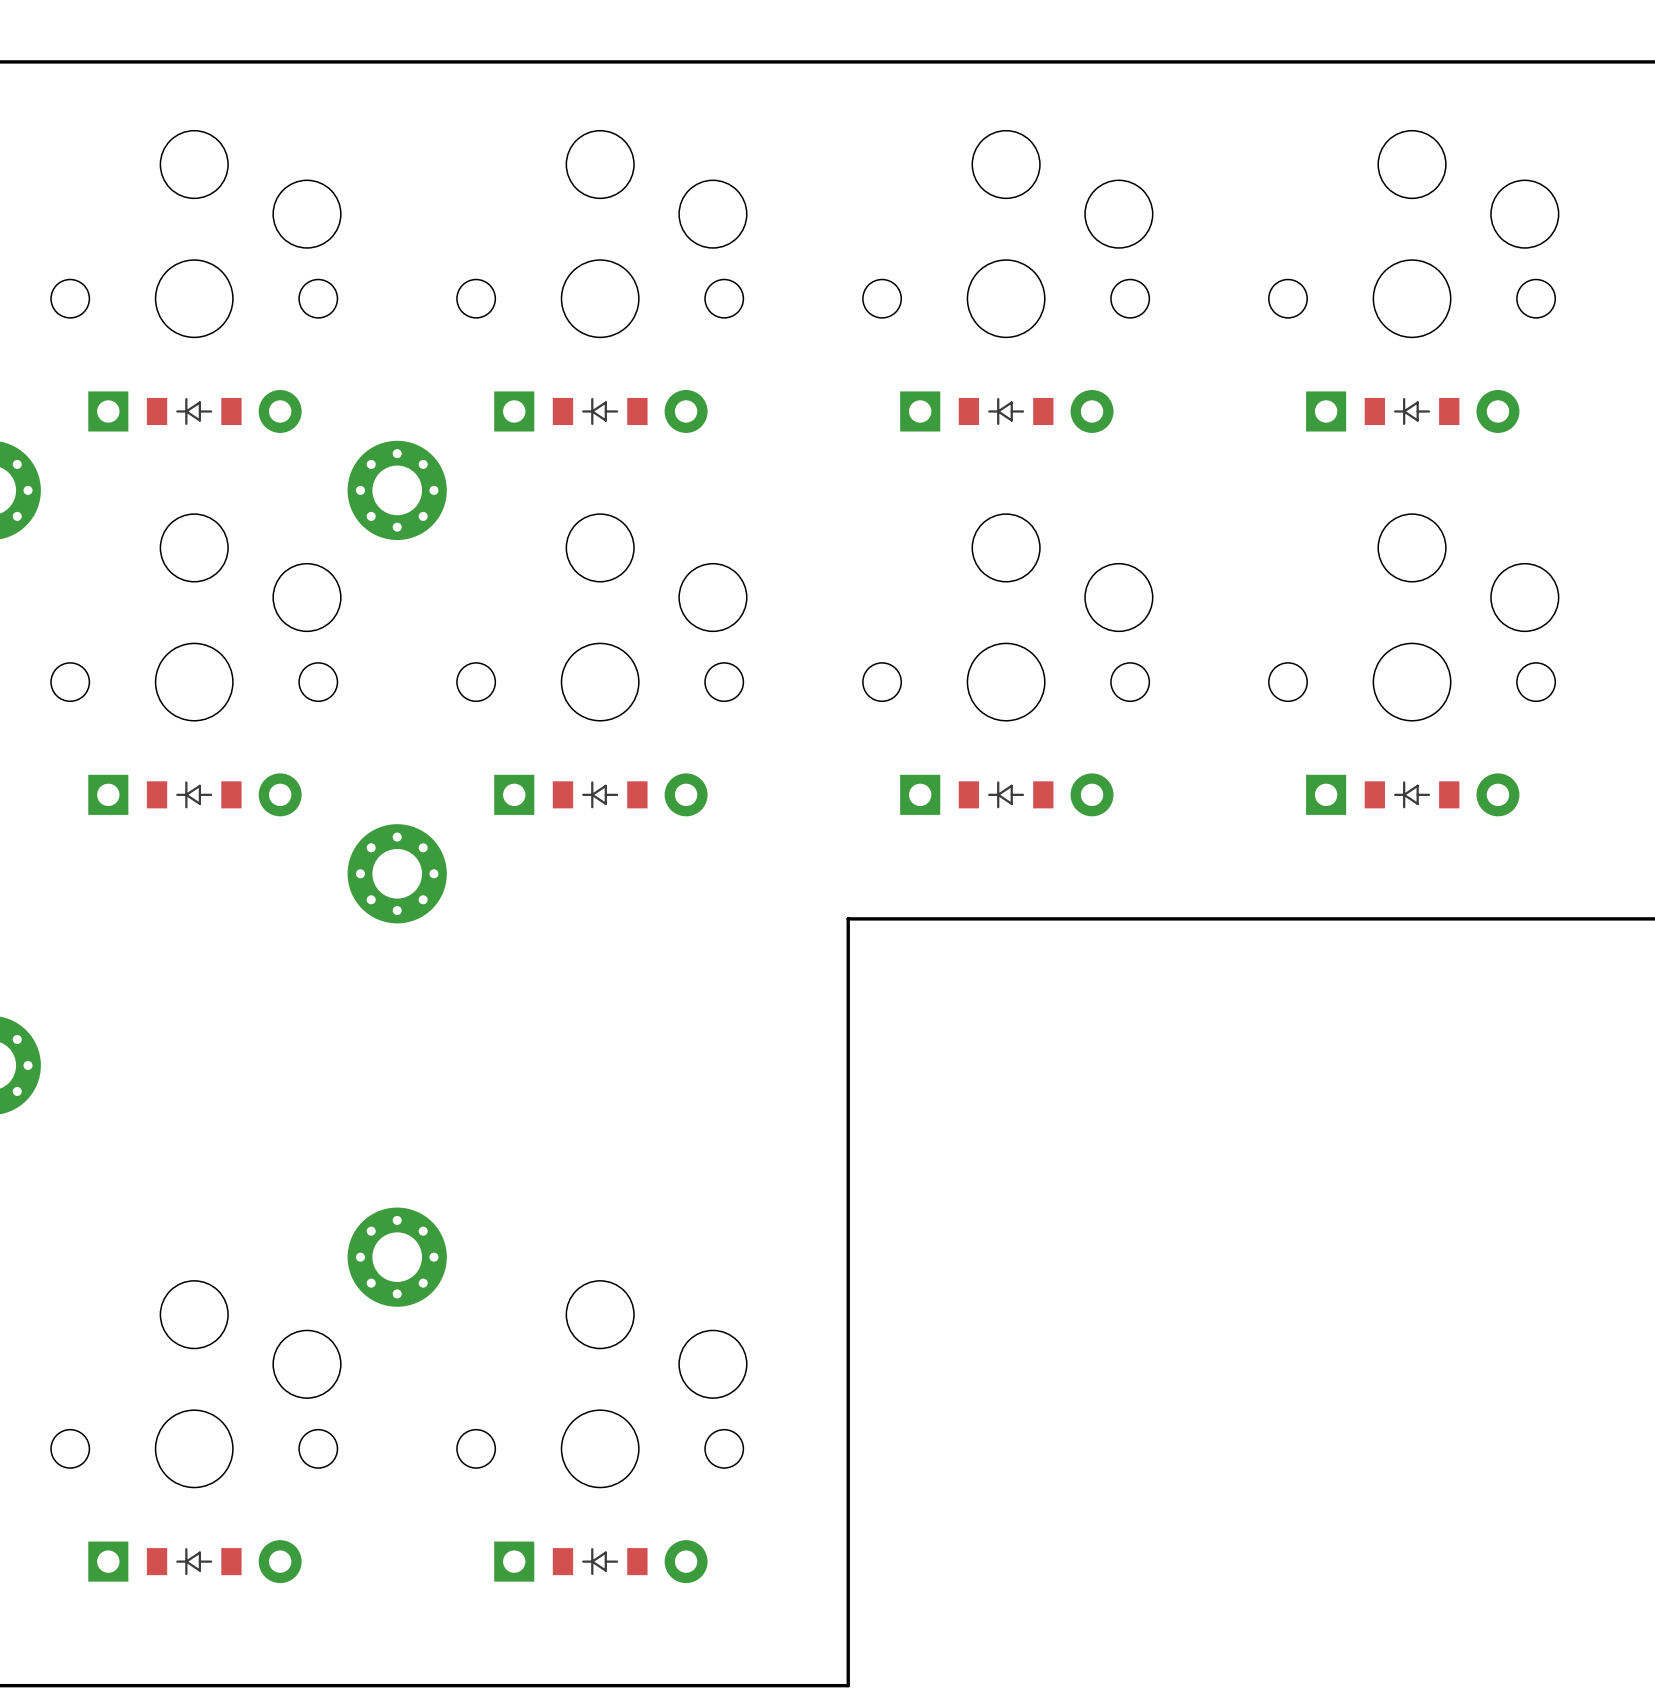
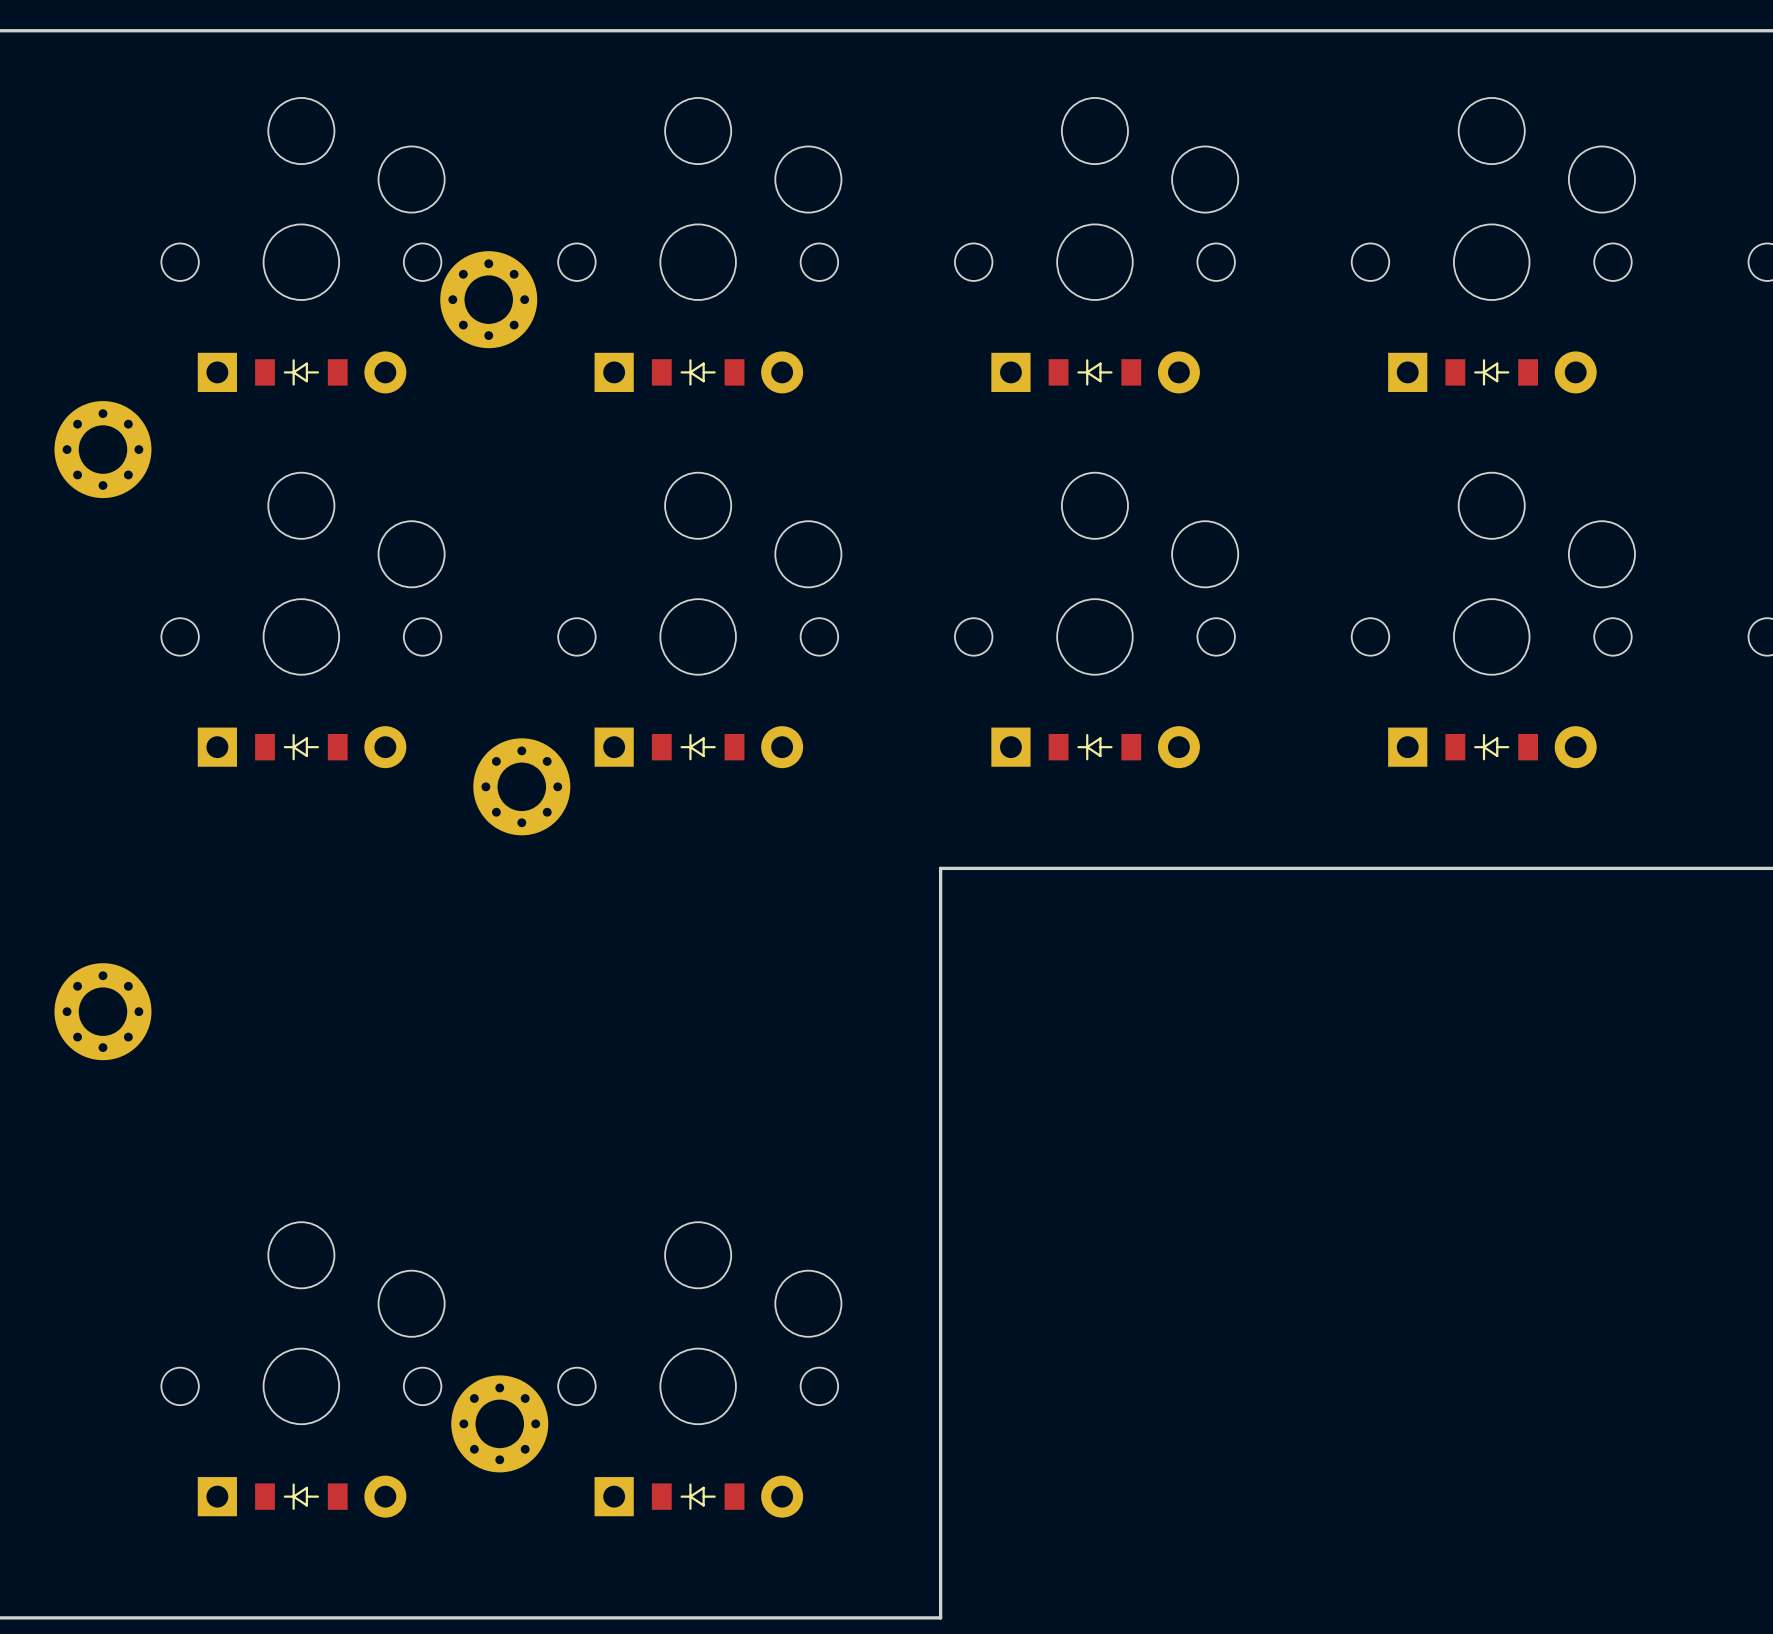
part position: (397, 490) -> (488, 299)
part position: (397, 873) -> (521, 786)
part: (397, 1257) -> none
part: none -> (499, 1423)

